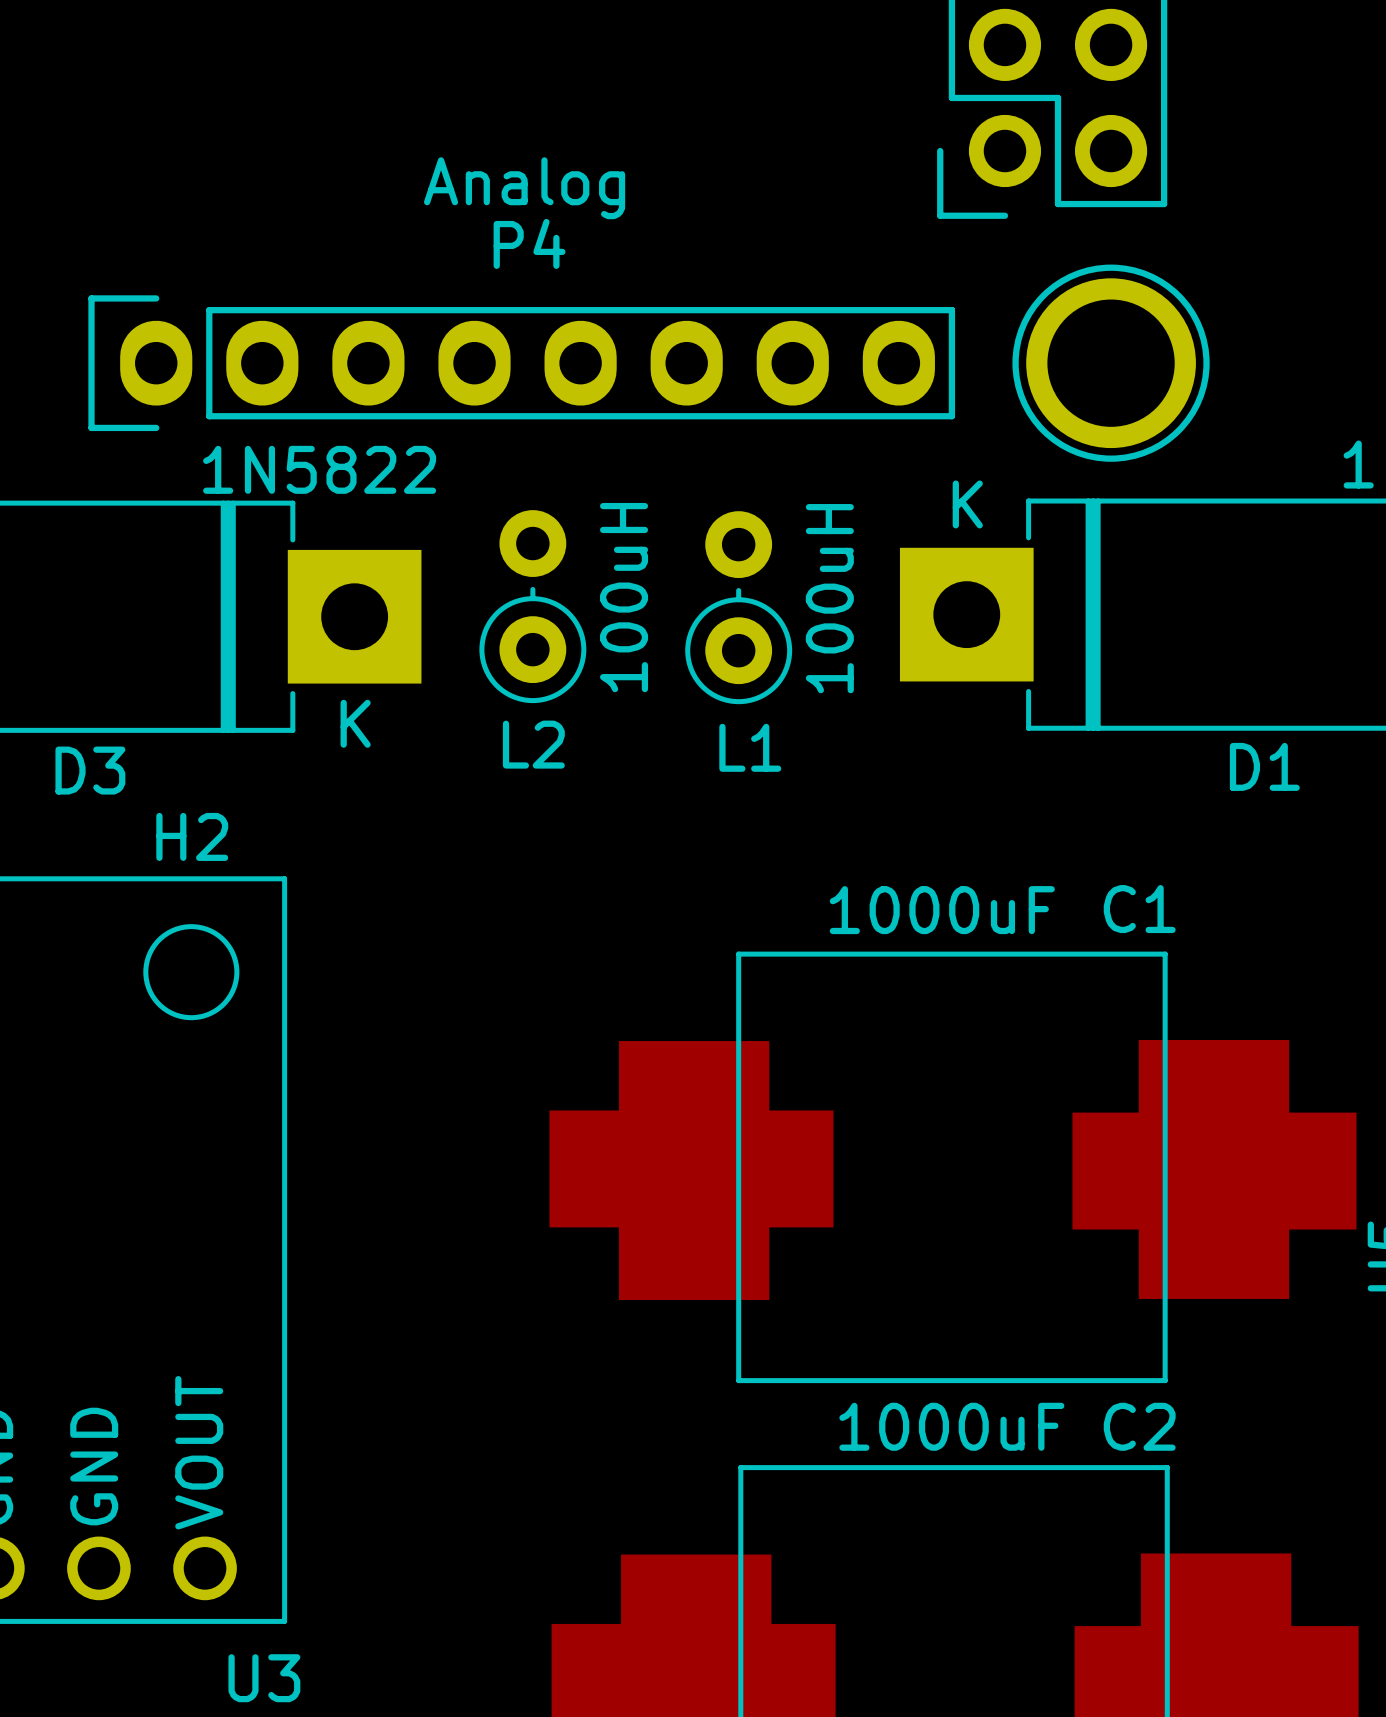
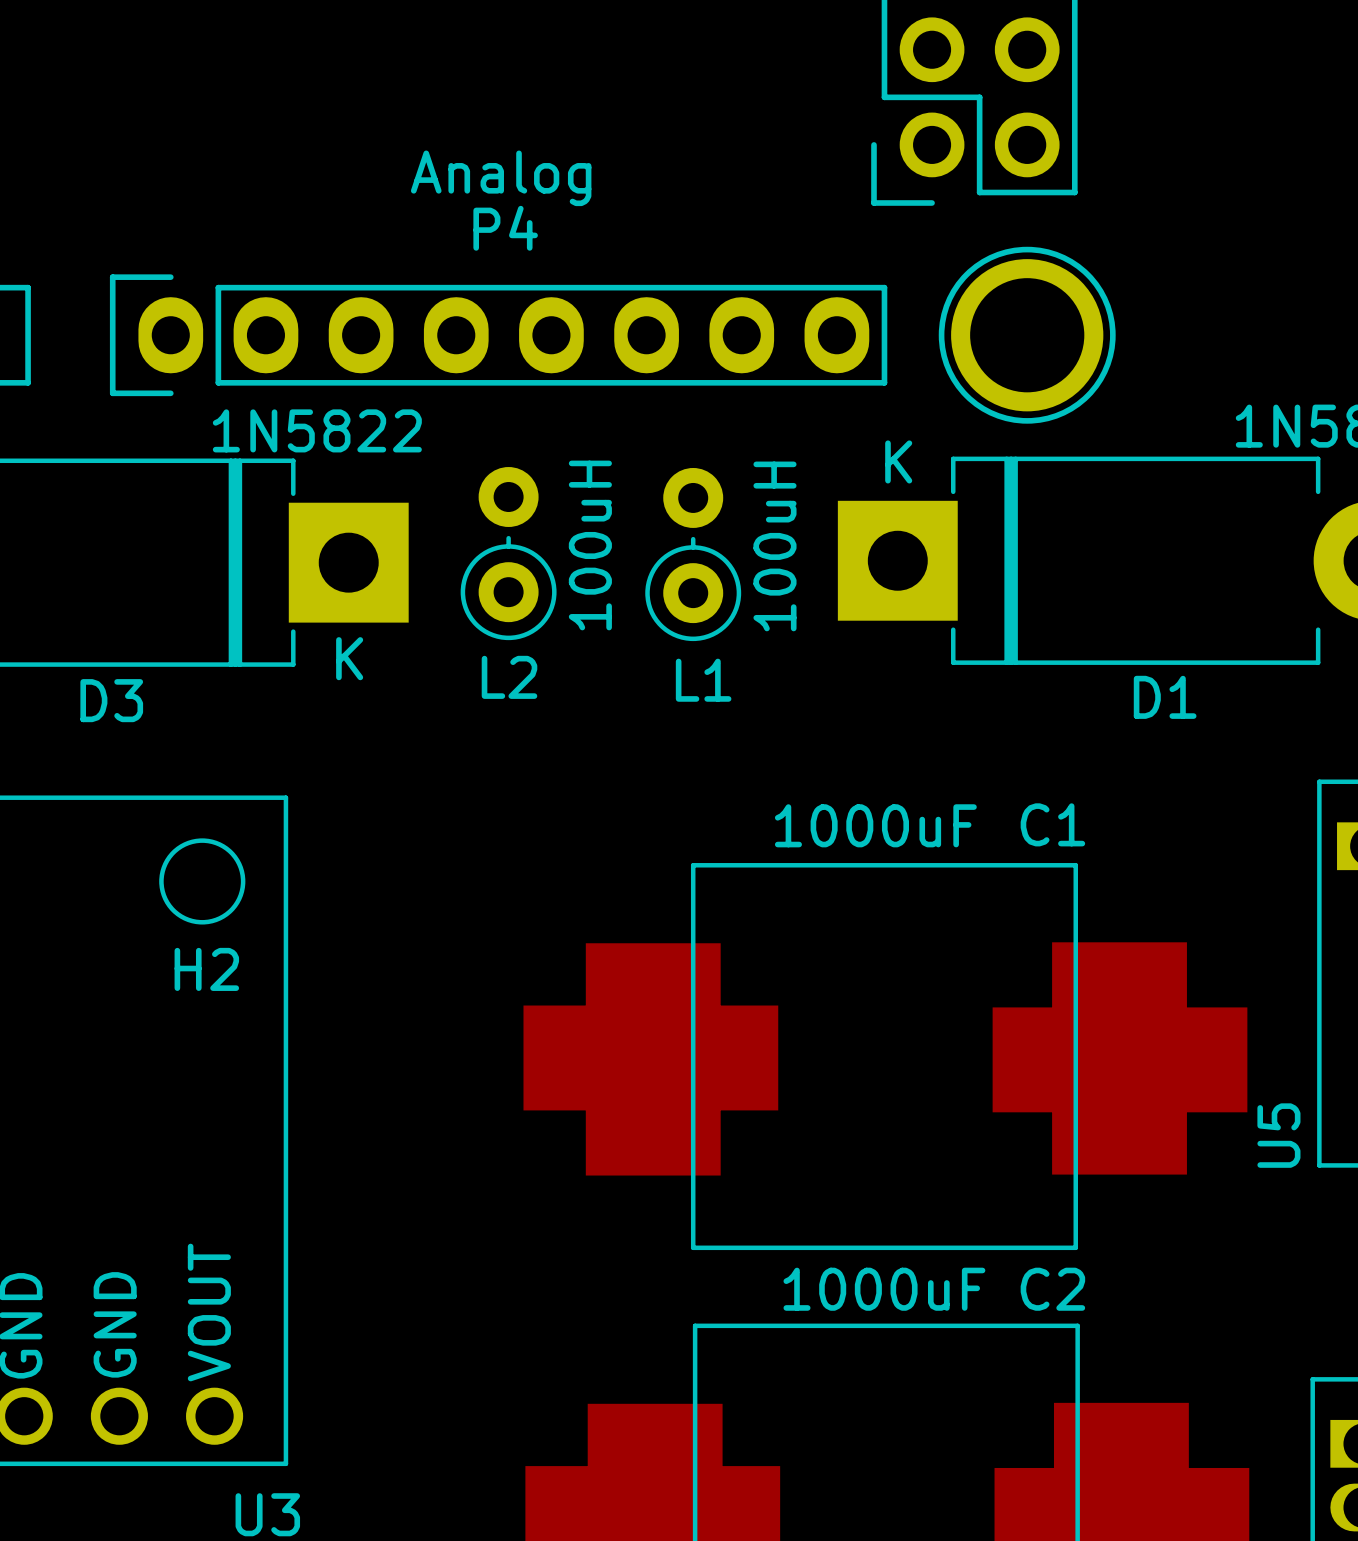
H2 name position: H2 (192, 836) -> H2 (206, 969)

